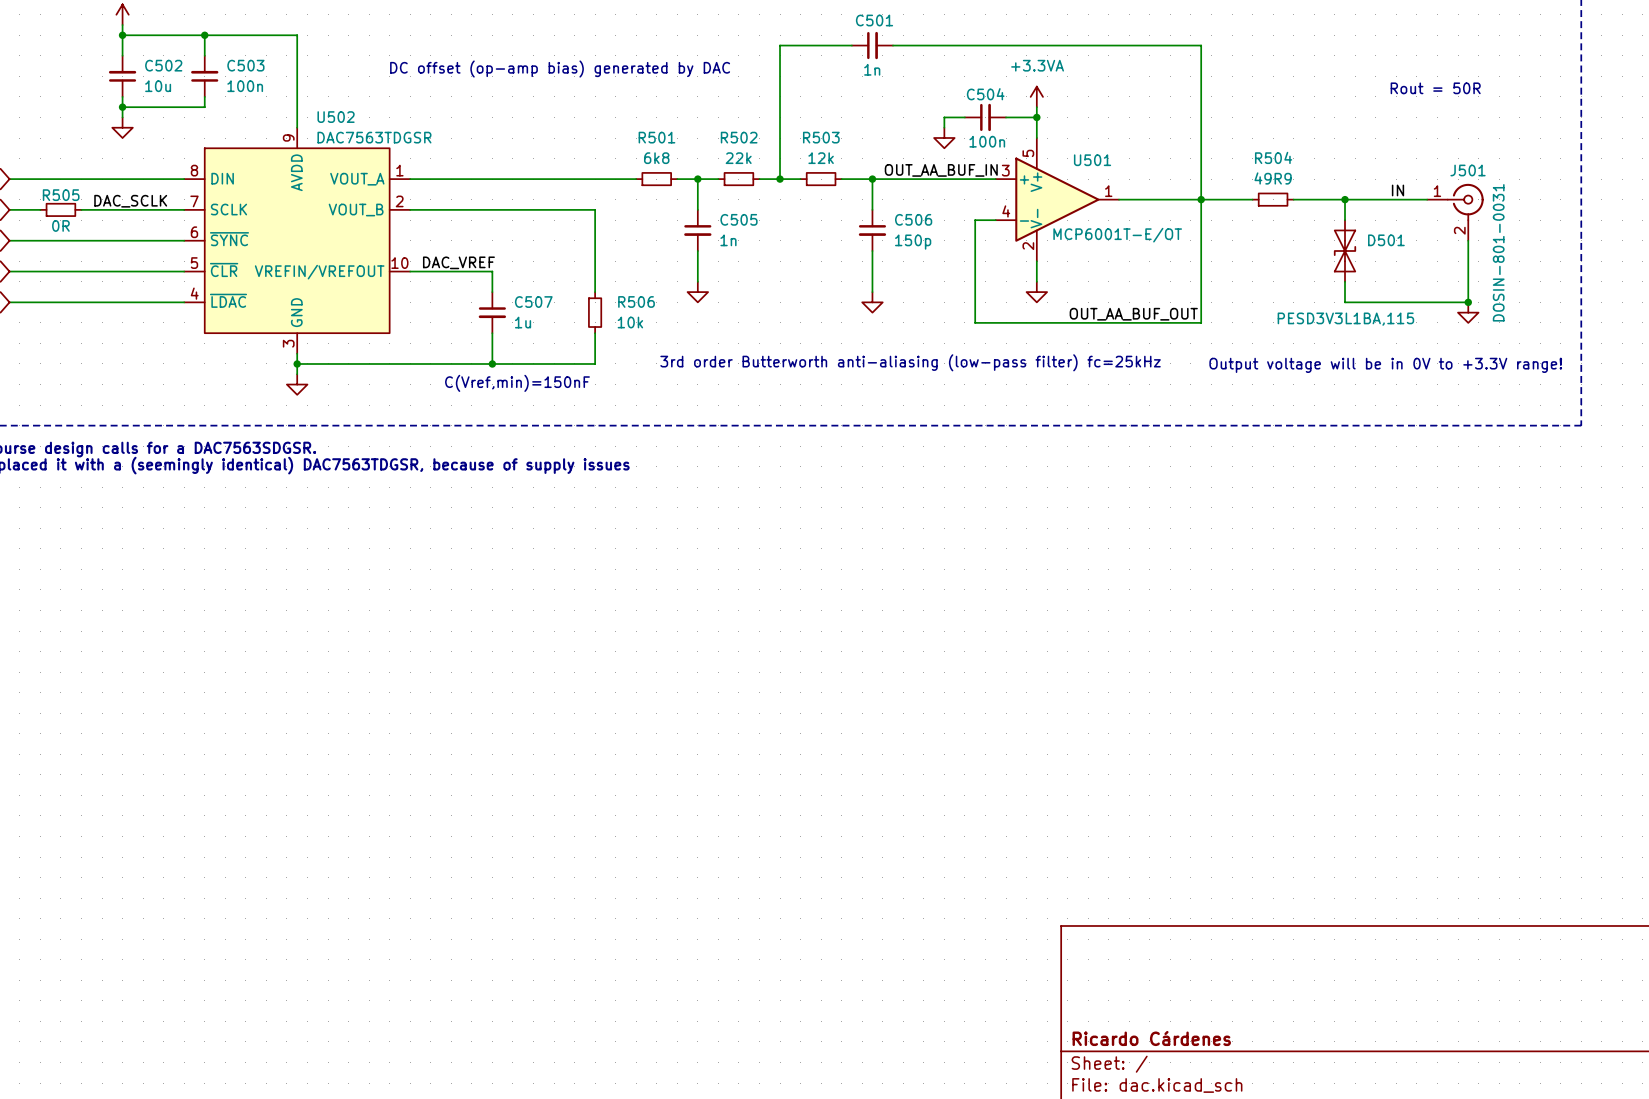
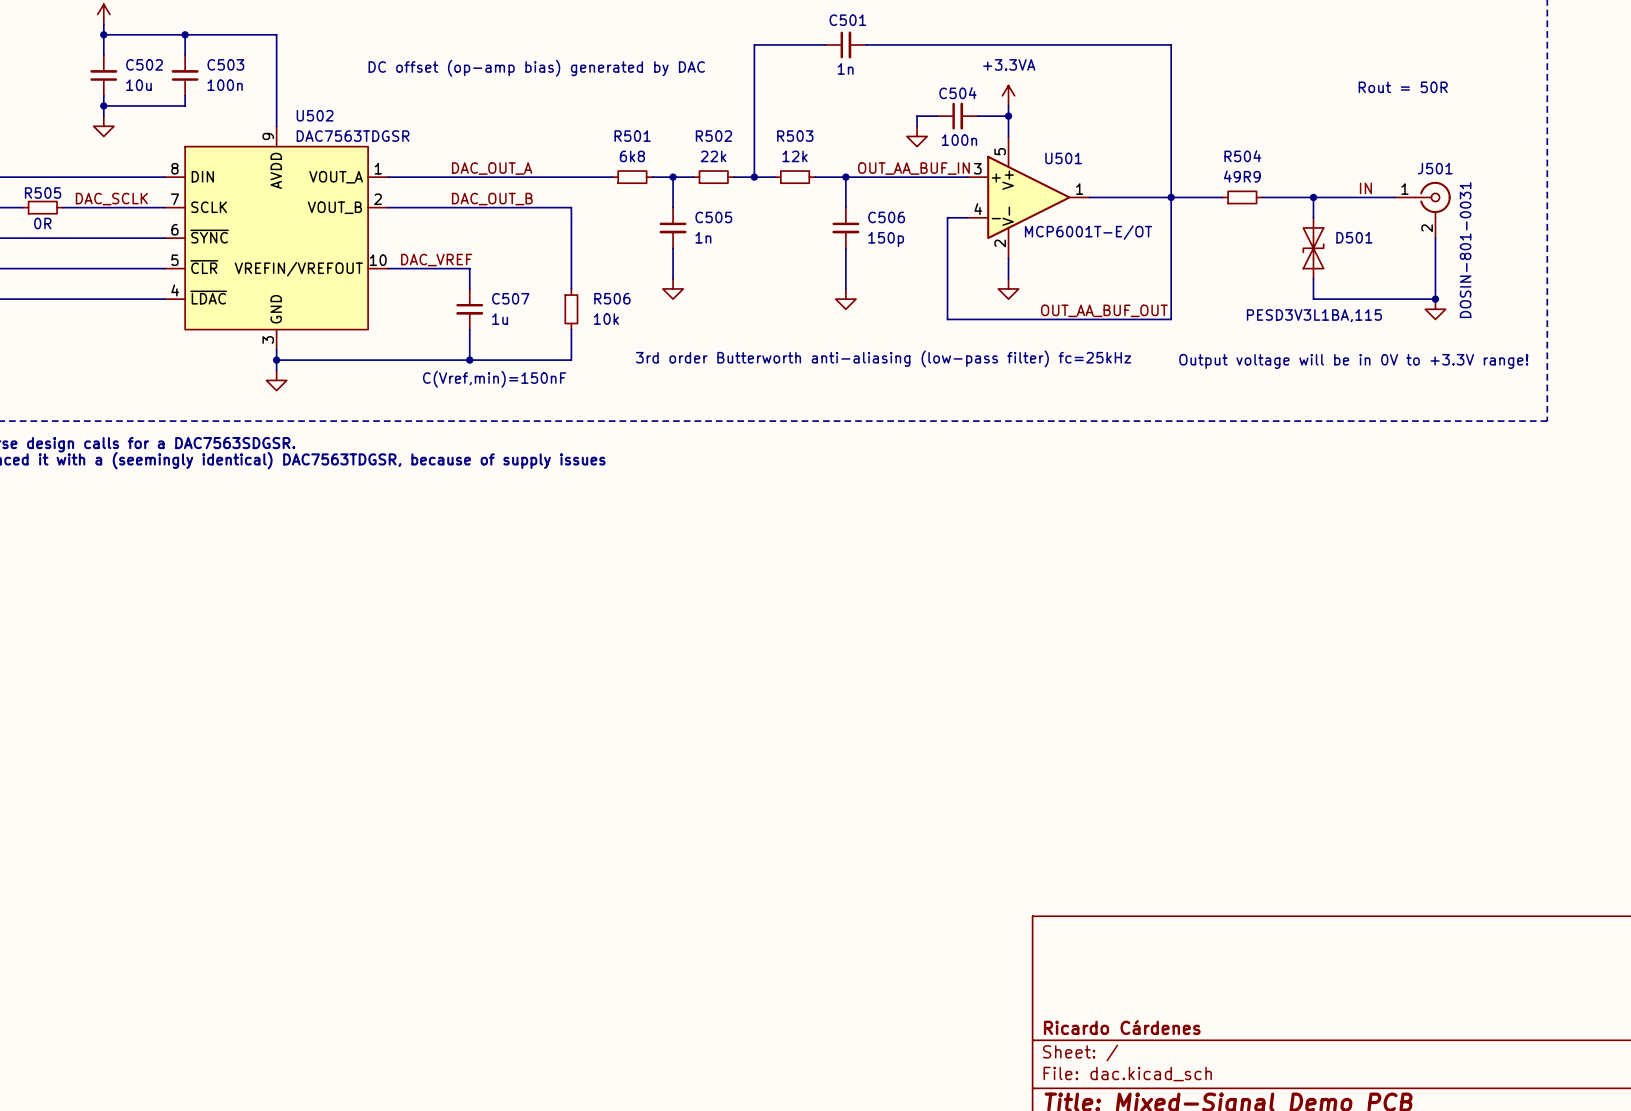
label: none -> DAC_OUT_A (492, 168)
label: none -> DAC_OUT_B (492, 199)

